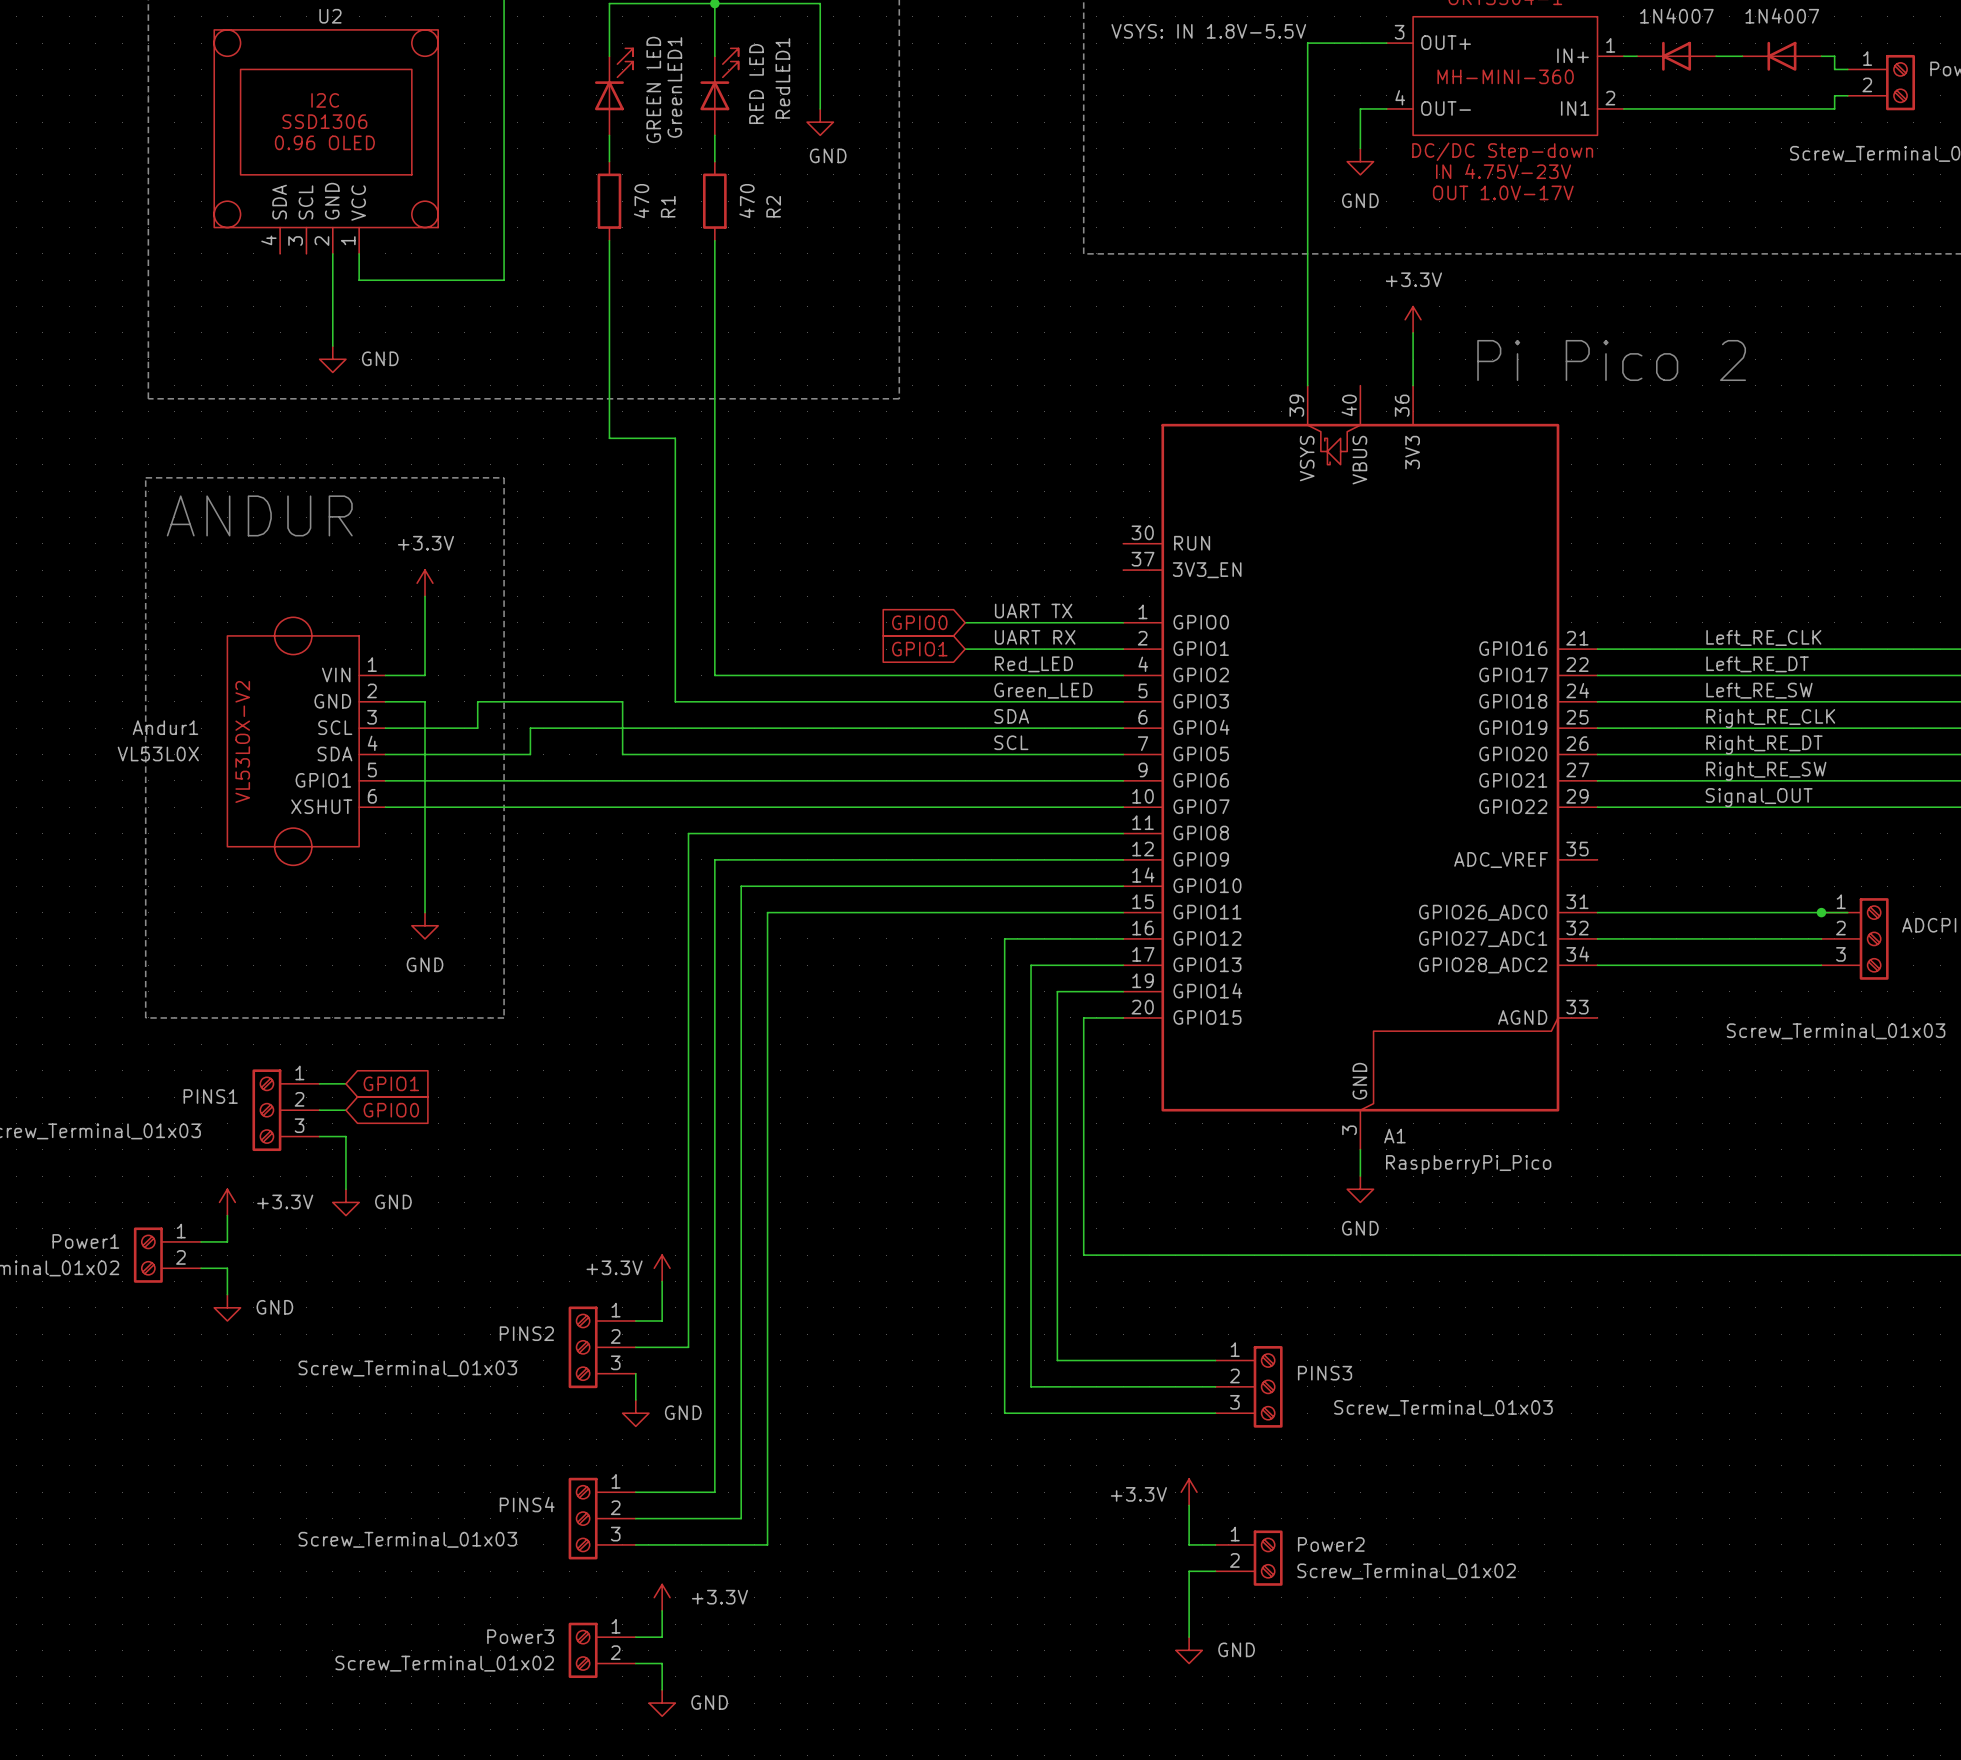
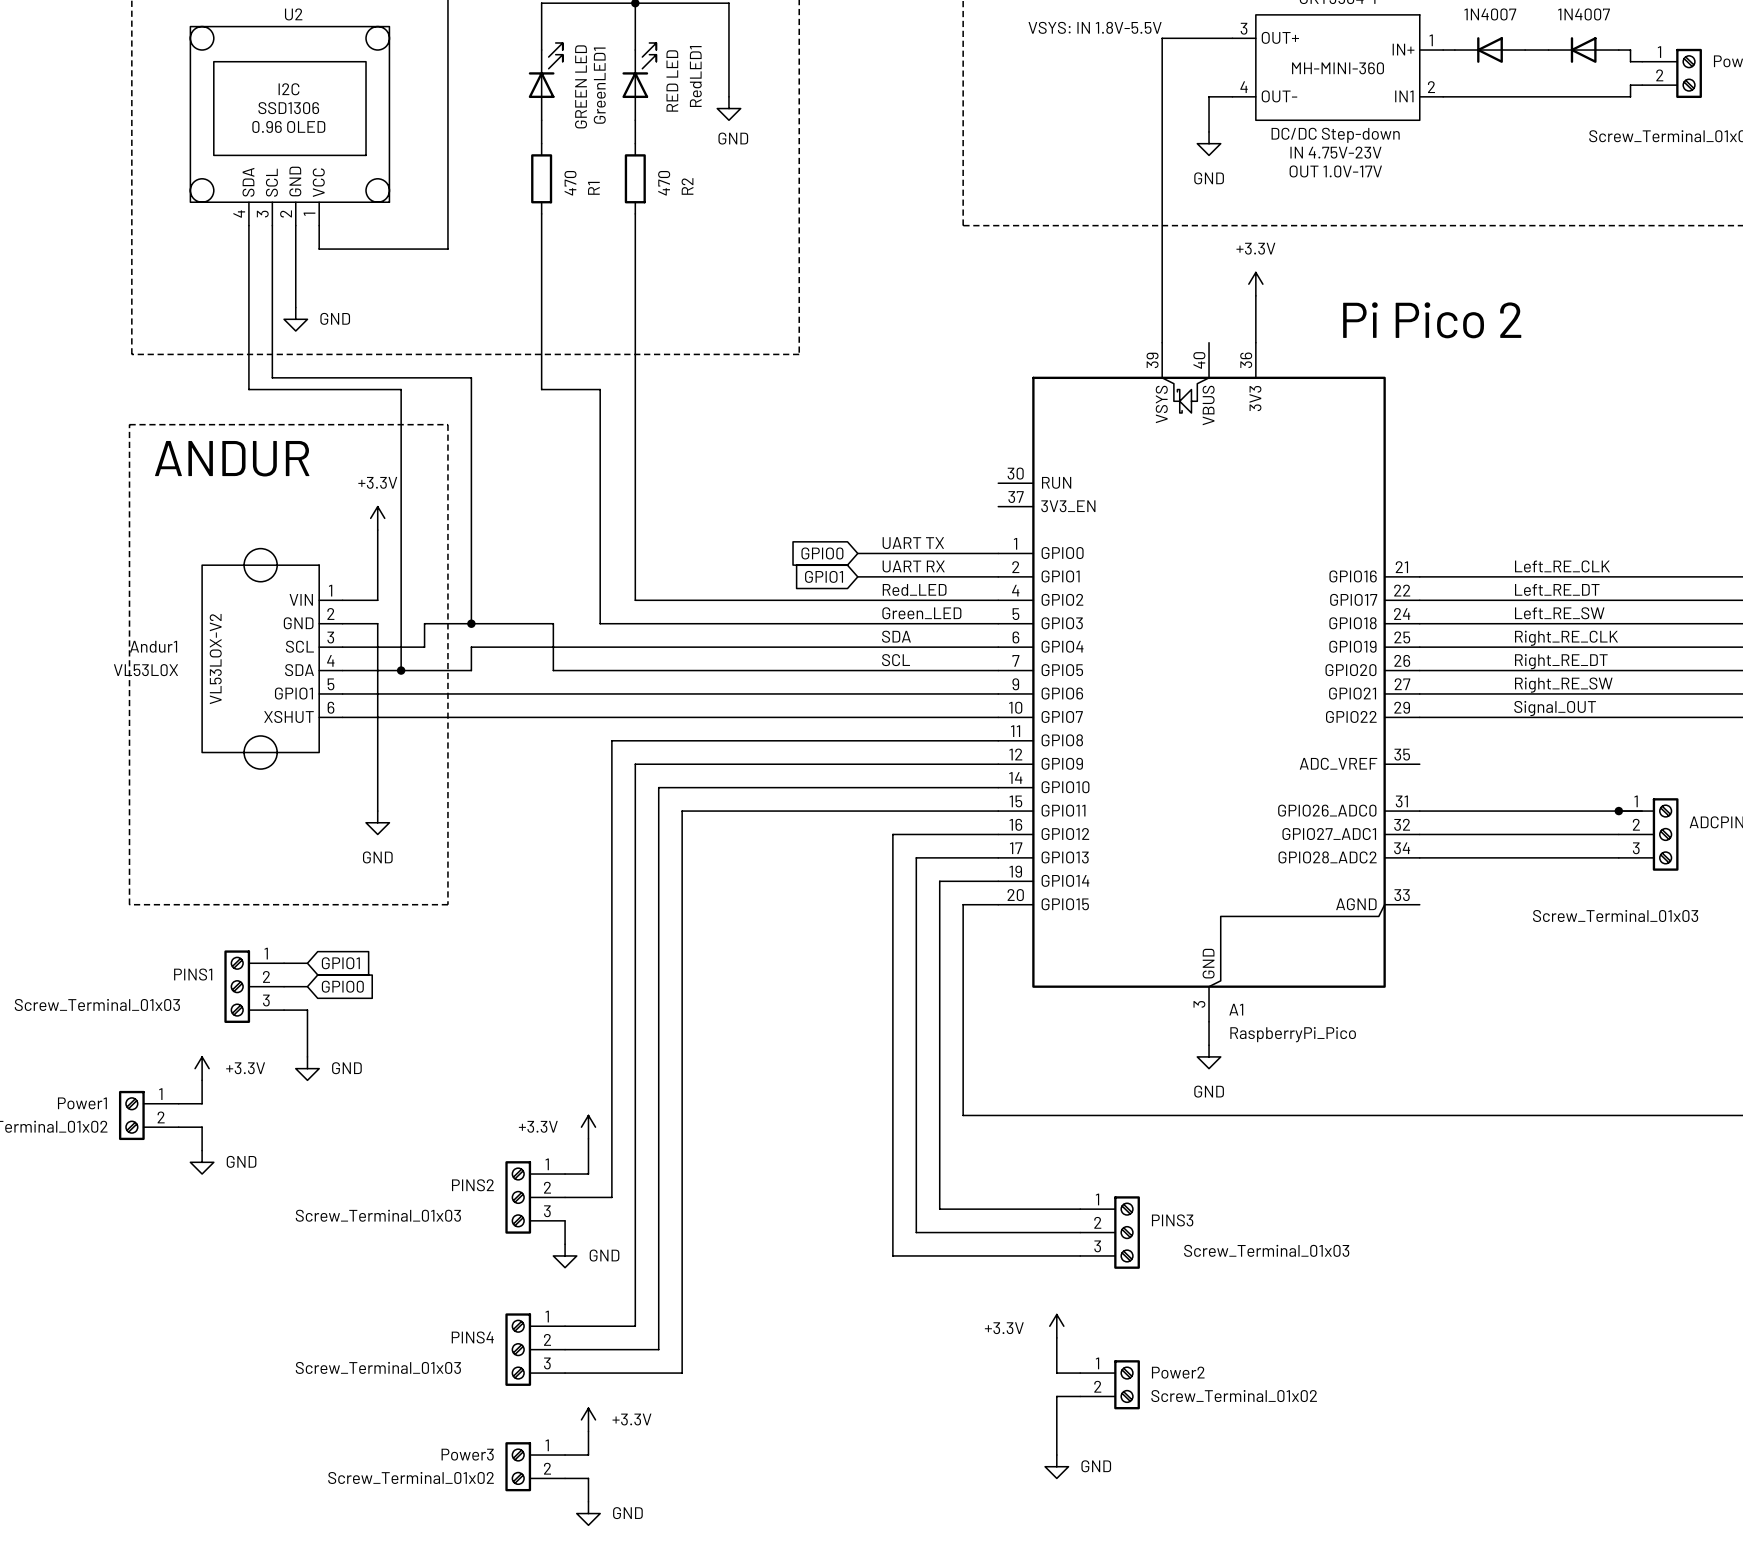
wire: none -> (248, 225) (248, 389) (401, 389) (401, 670)
wire: none -> (272, 225) (272, 377) (471, 377) (471, 623)
junction: none -> (471, 623)
junction: none -> (401, 670)

